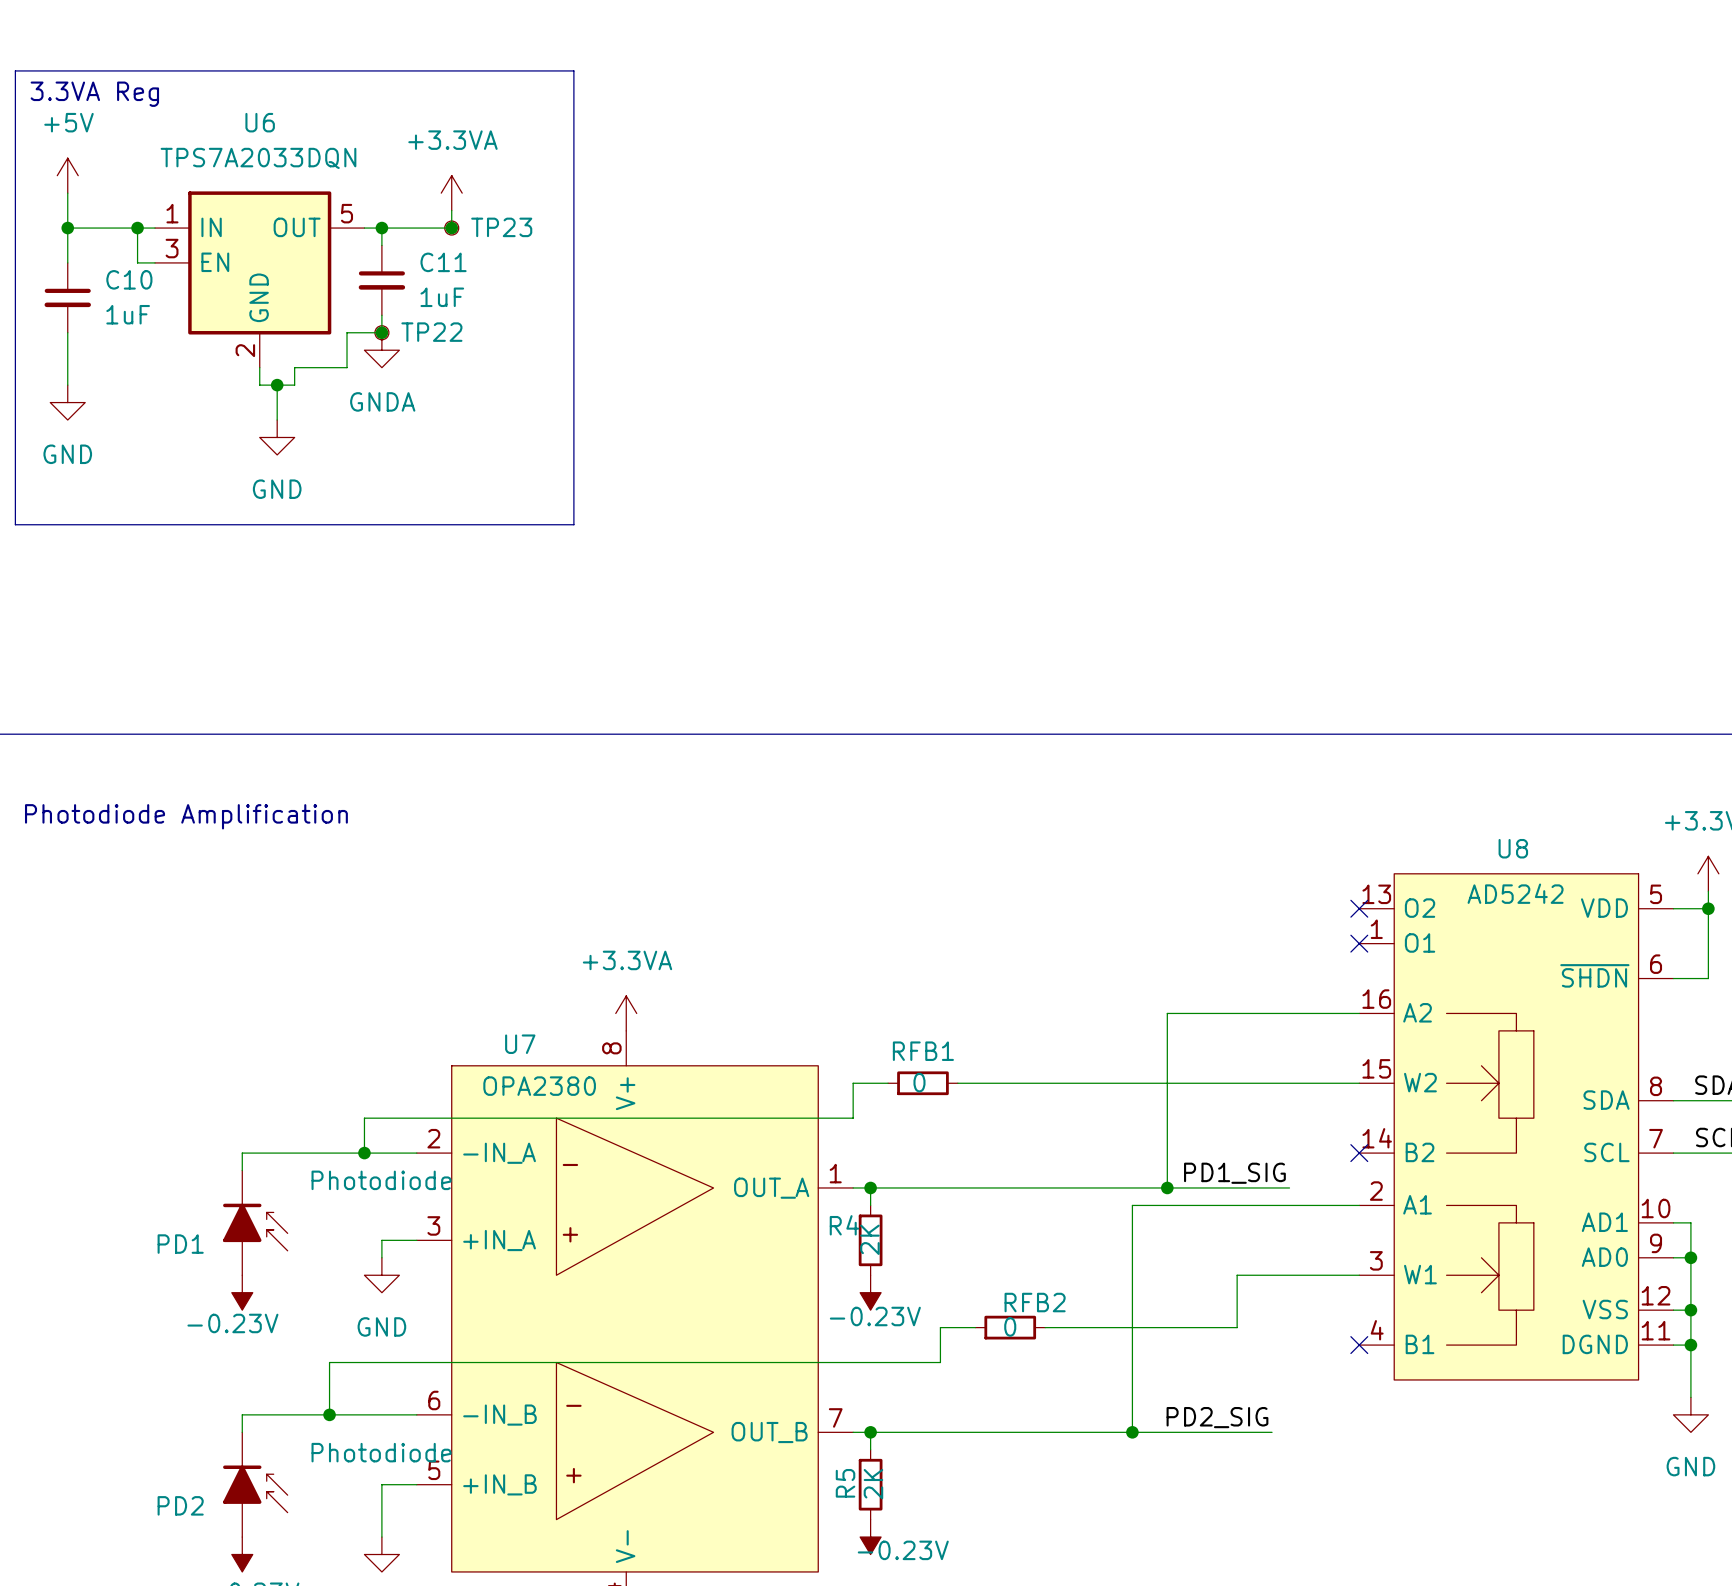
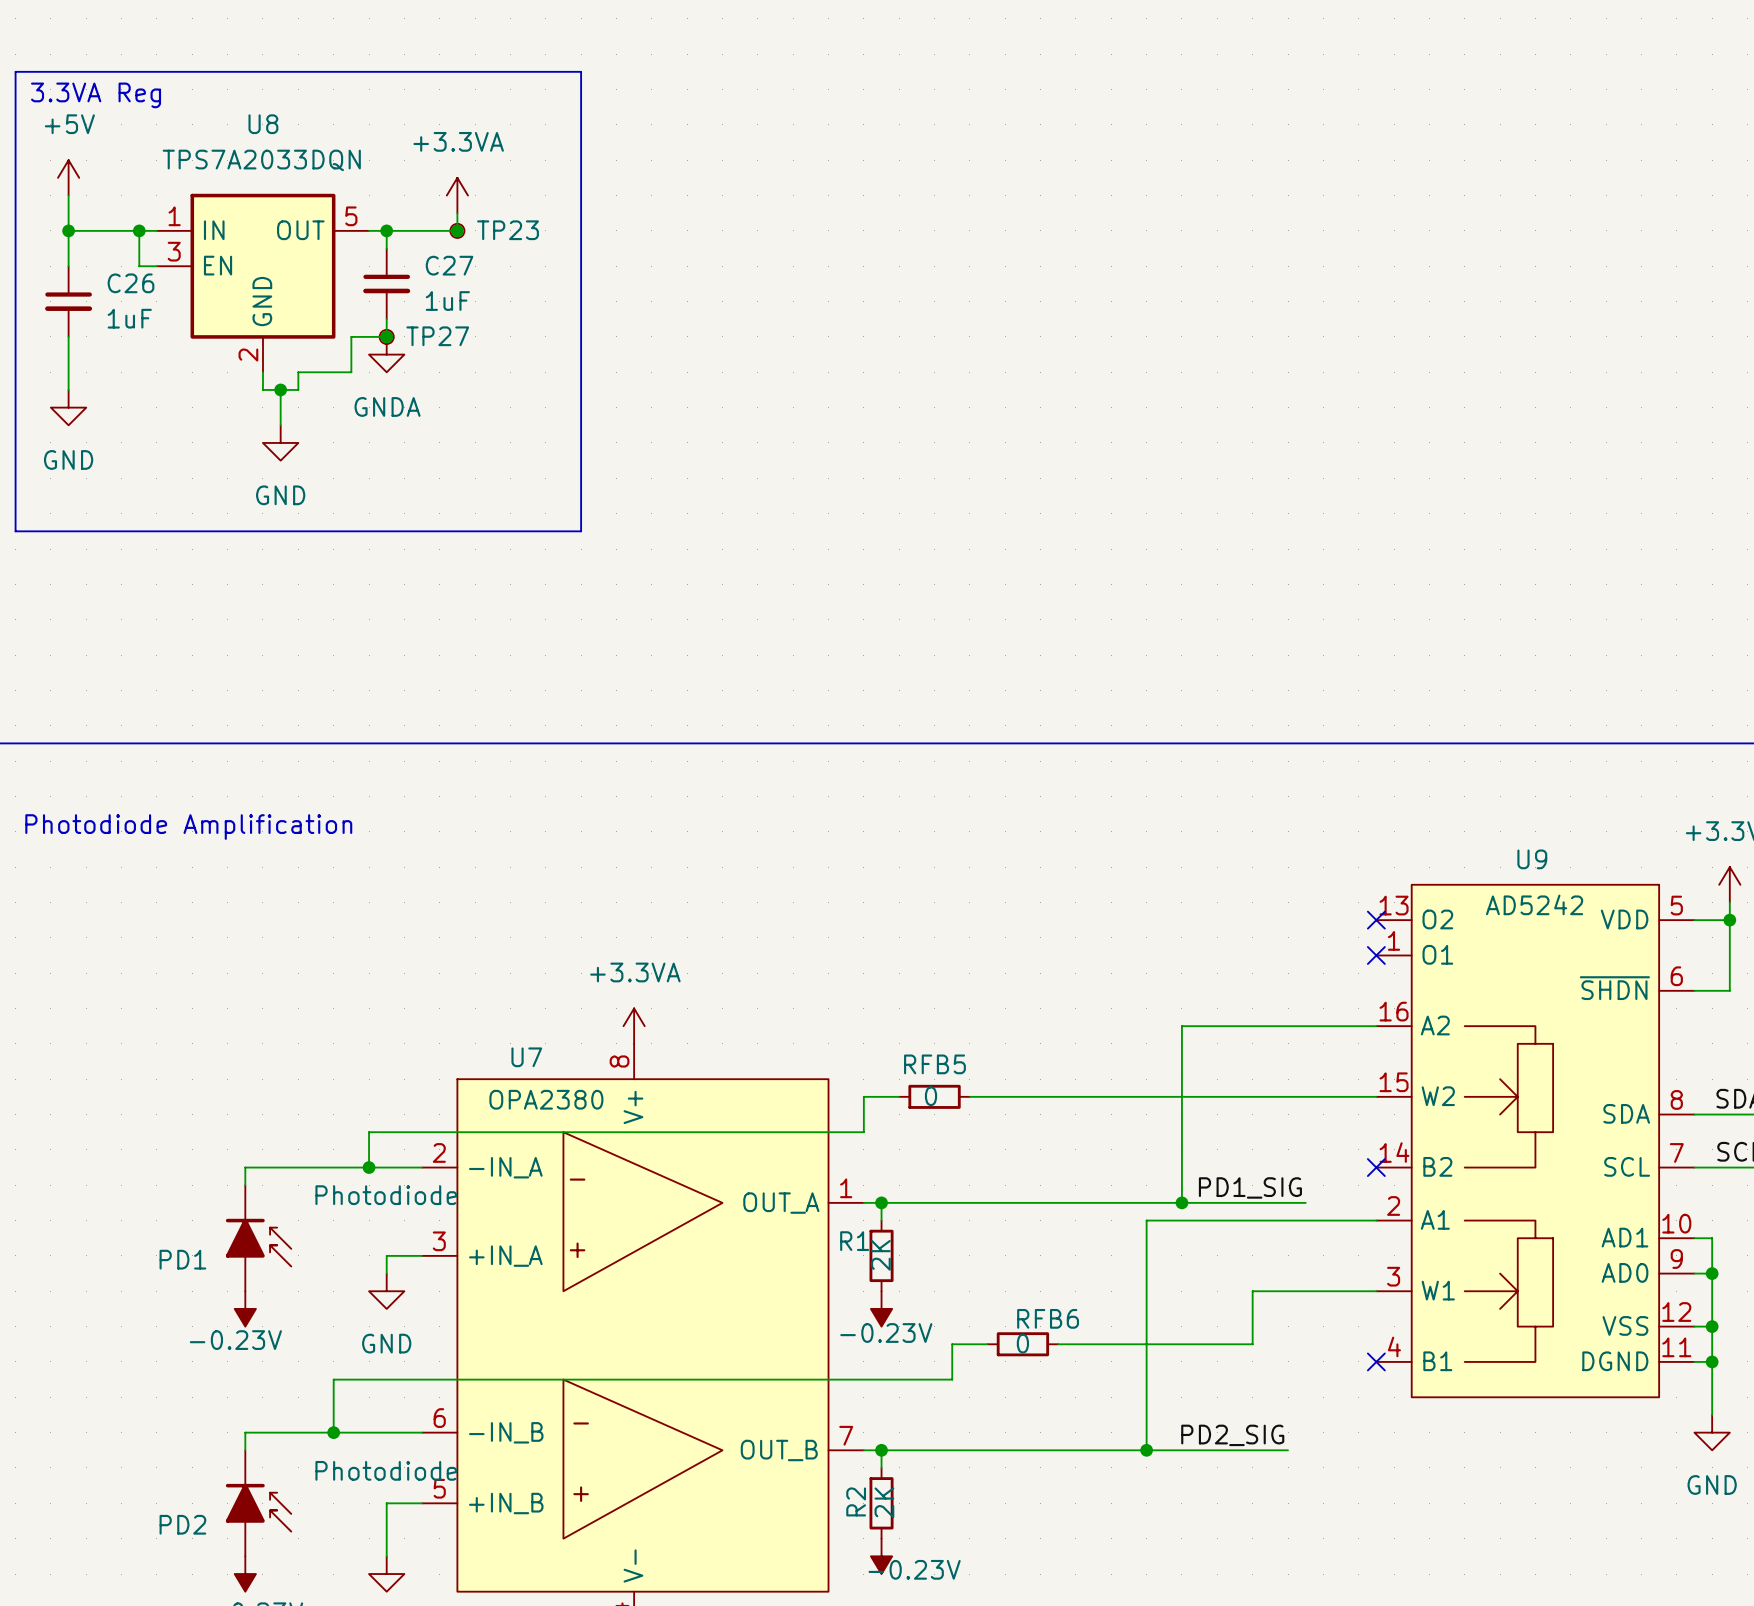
U6 name: U6 (260, 122) -> U8 (263, 124)
C11 name: C11 (443, 262) -> C27 (449, 265)
C10 name: C10 (129, 279) -> C26 (131, 283)
TP22 name: TP22 (431, 332) -> TP27 (437, 336)
U8 name: U8 (1513, 848) -> U9 (1532, 859)
RFB1 name: RFB1 (923, 1051) -> RFB5 (934, 1064)
R4 name: R4 (844, 1225) -> R1 (854, 1241)
RFB2 name: RFB2 (1035, 1302) -> RFB6 (1048, 1318)
R5 name: R5 (845, 1483) -> R2 (856, 1501)

